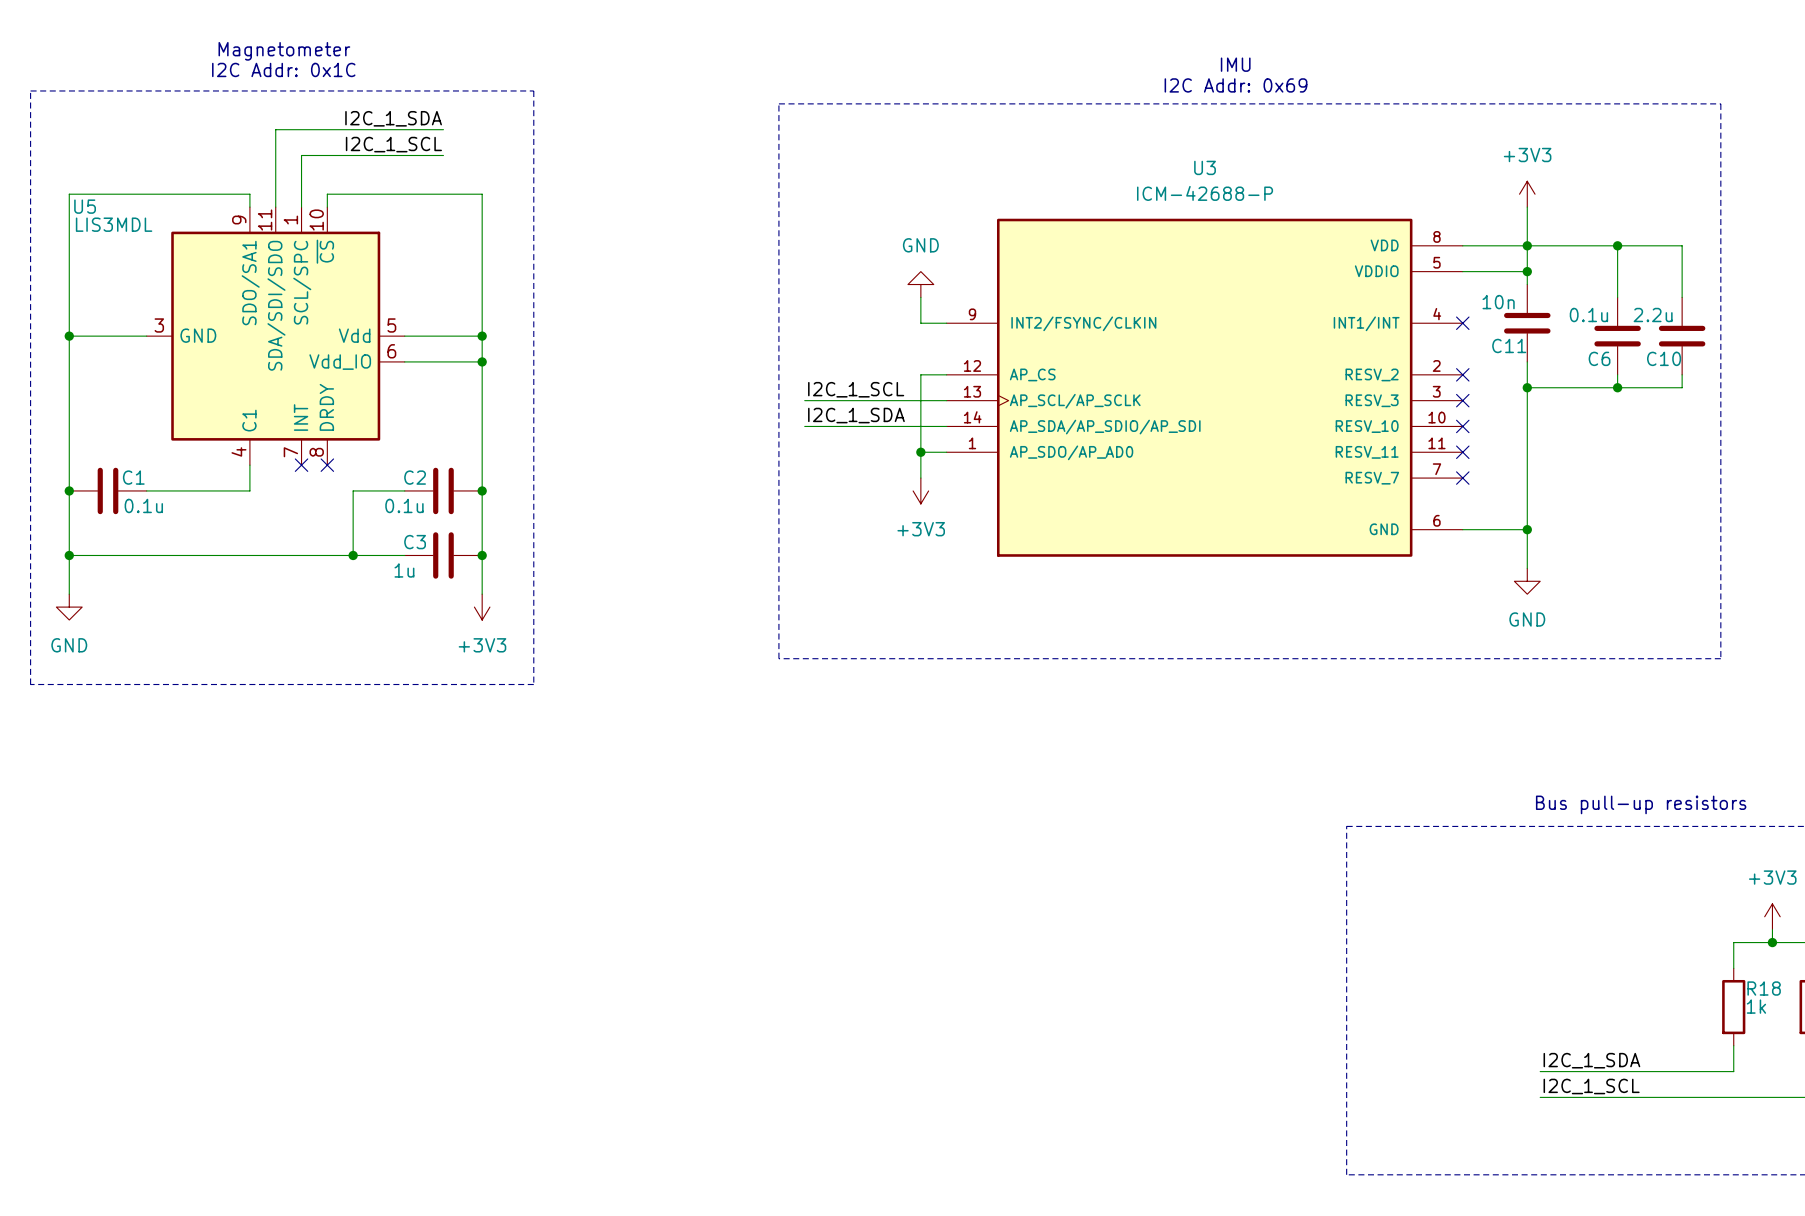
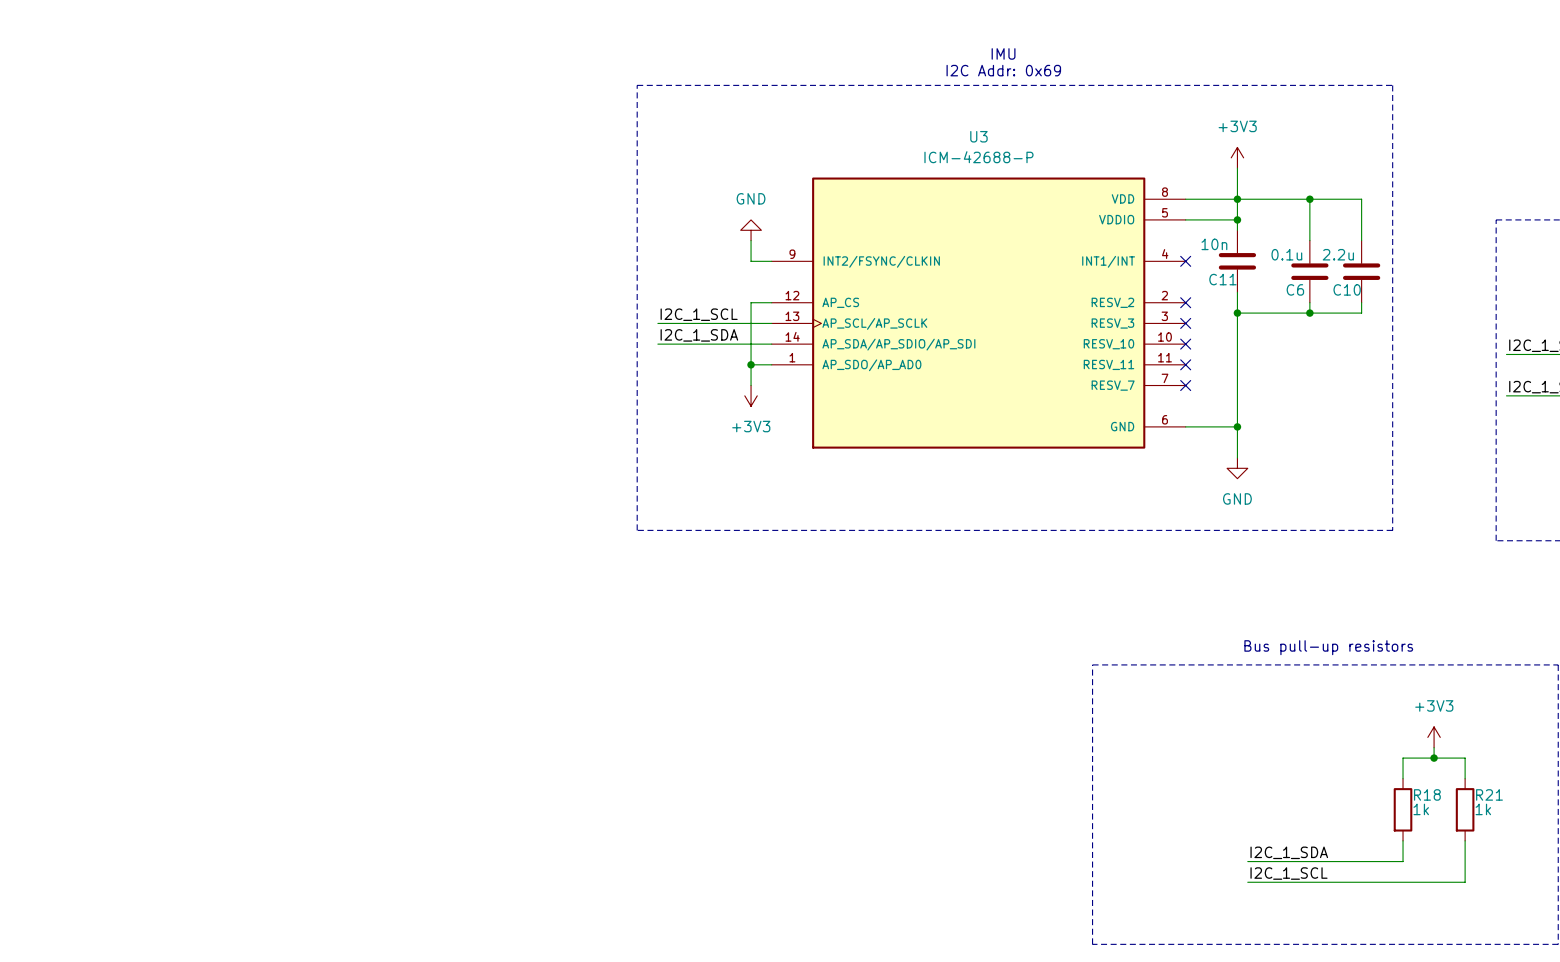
text: Magnetometer (284, 51) -> none
text: I2C Addr: 0x1C (283, 69) -> none
line: (30, 90) (533, 90) (533, 684) (30, 684) (30, 90) -> none
label: I2C_1_SDA (393, 118) -> none
wire: (443, 129) (275, 129) (275, 207) -> none
label: I2C_1_SCL (393, 144) -> none
wire: (443, 155) (301, 155) (301, 207) -> none
wire: (249, 207) (249, 194) (69, 194) (69, 594) -> none
wire: (327, 207) (327, 194) (482, 194) (482, 594) -> none
wire: (69, 336) (146, 336) -> none
junction: (69, 336) -> none
U5: LIS3MDL (275, 336) -> none
wire: (404, 336) (482, 336) -> none
junction: (482, 336) -> none
wire: (404, 361) (482, 361) -> none
junction: (482, 361) -> none
wire: (249, 465) (249, 490) (146, 490) -> none
no-connect mark: (301, 465) -> none
no-connect mark: (327, 465) -> none
junction: (69, 490) -> none
C1: 0.1u (107, 490) -> none
wire: (404, 490) (353, 490) (353, 555) -> none
C2: 0.1u (443, 490) -> none
junction: (482, 490) -> none
wire: (69, 555) (404, 555) -> none
junction: (69, 555) -> none
junction: (353, 555) -> none
C3: 1u (443, 555) -> none
junction: (482, 555) -> none
power symbol: GND (69, 607) -> none
power symbol: +3V3 (482, 607) -> none

